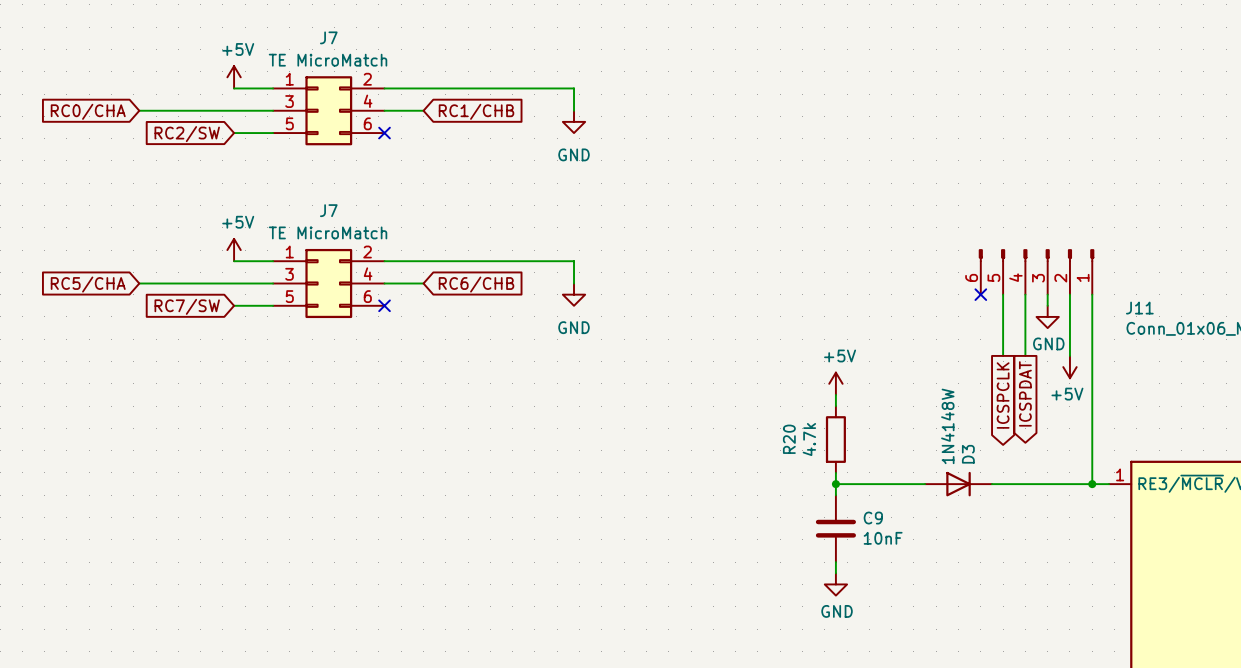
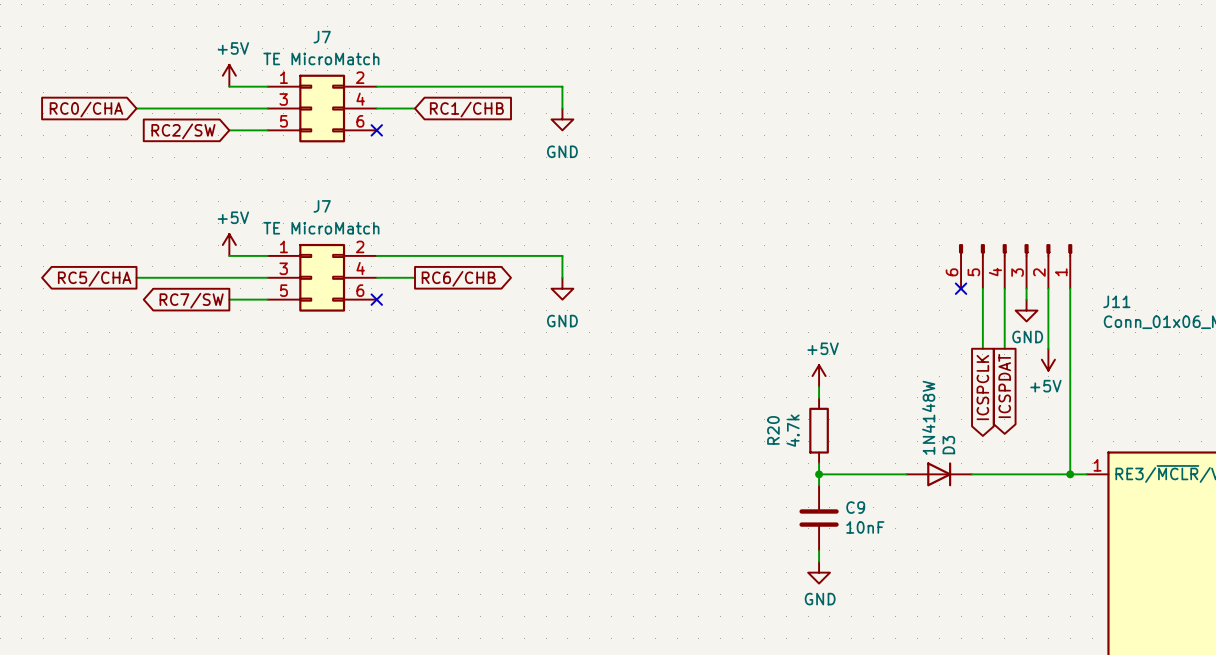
global label shape: input (88, 284) -> output (94, 278)
global label shape: input (476, 284) -> output (458, 278)
global label shape: input (187, 306) -> output (191, 300)

